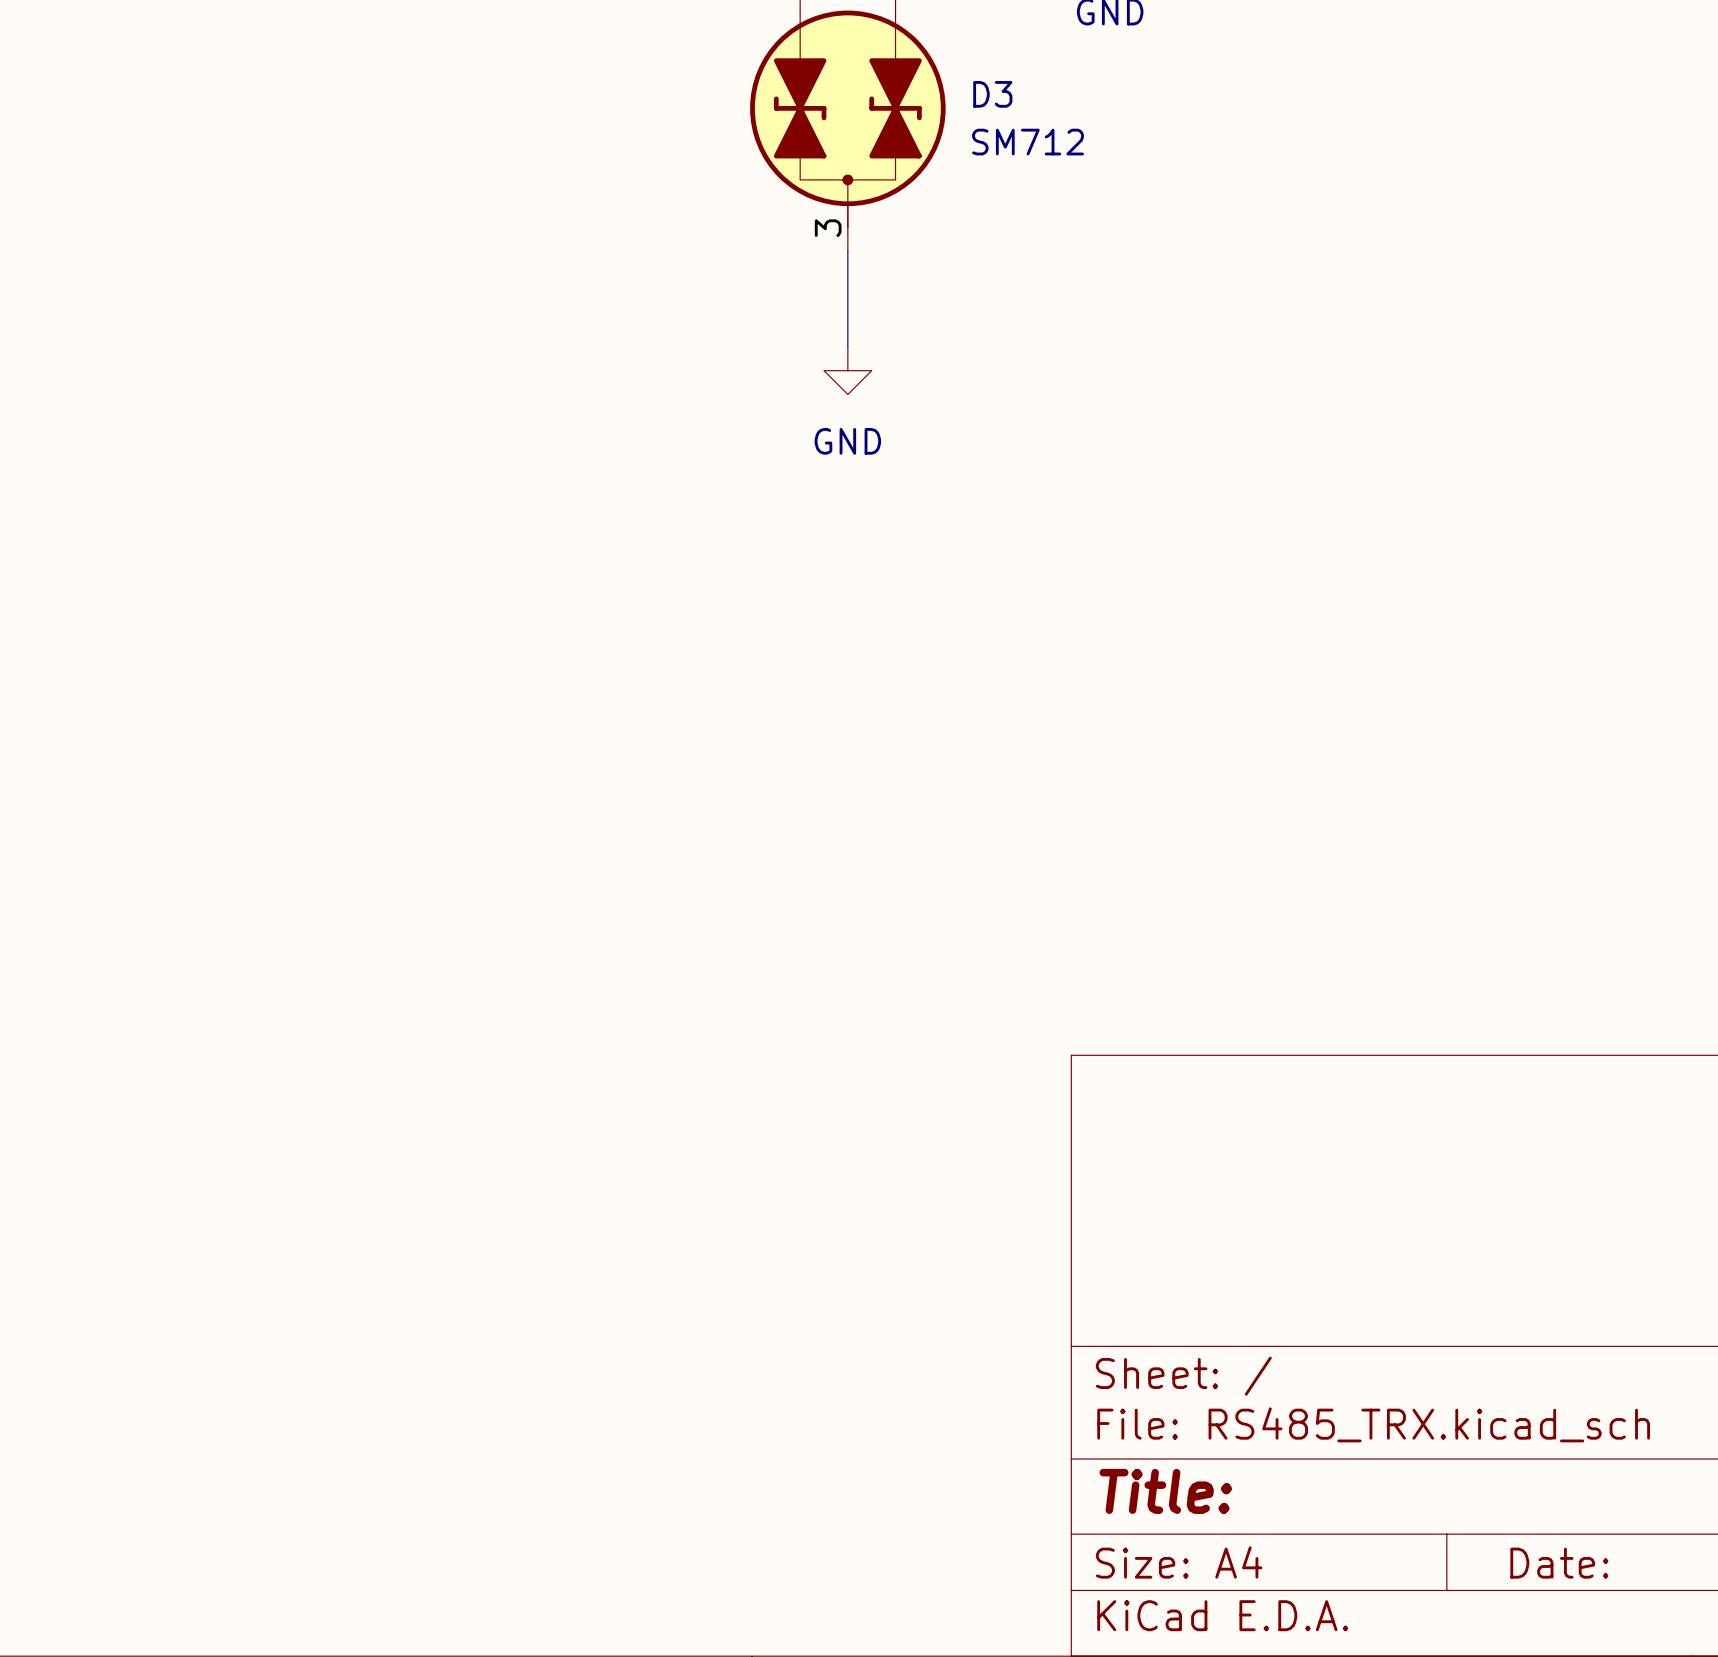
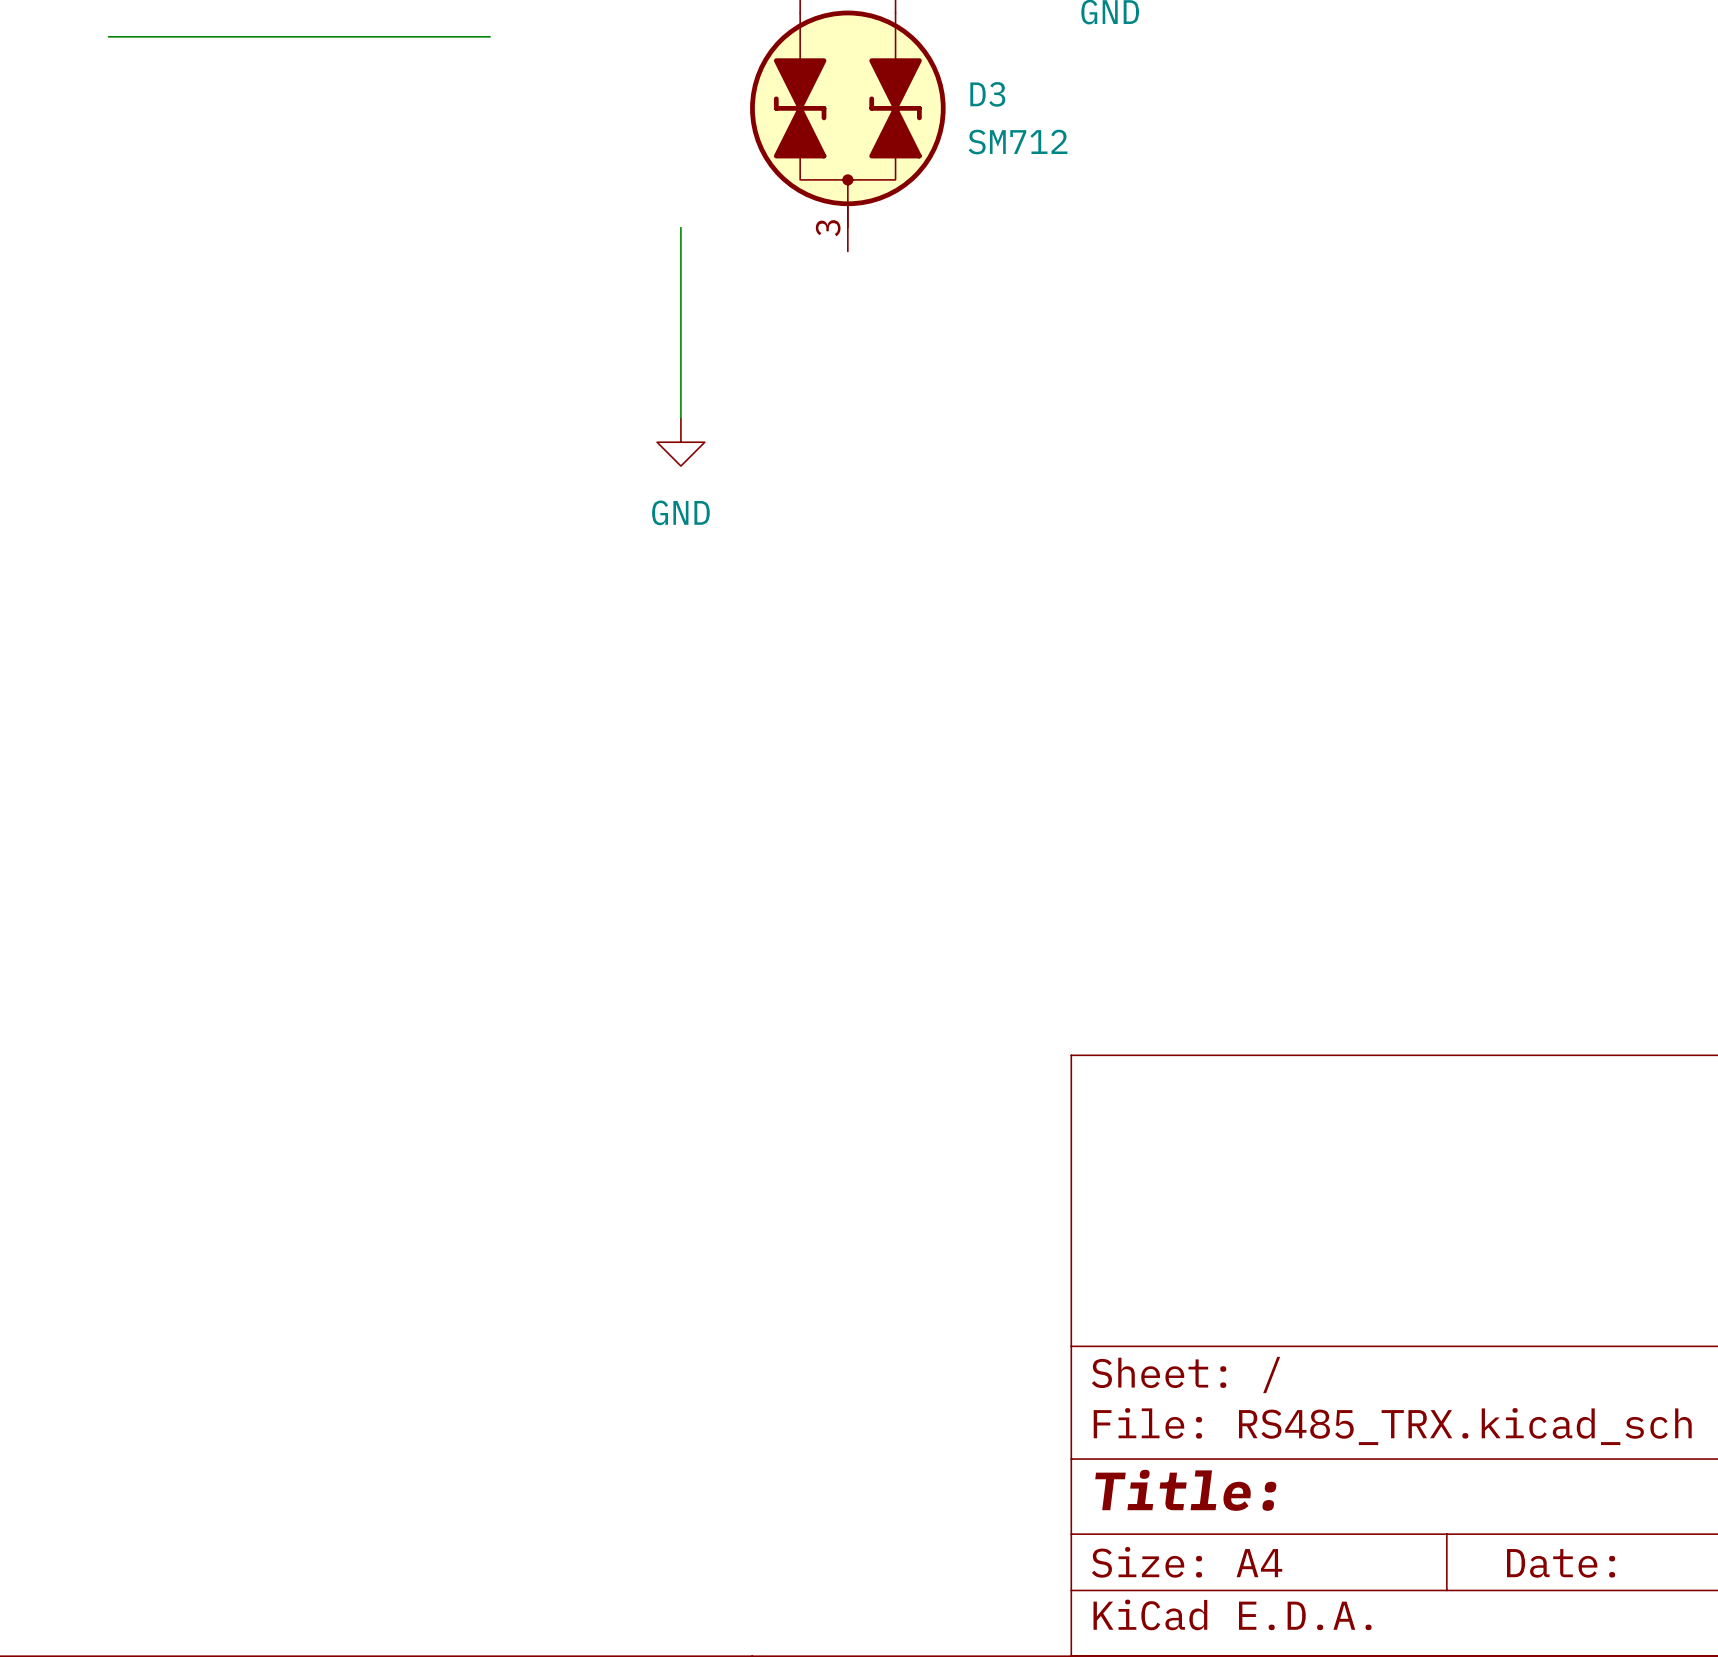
wire: none -> (108, 36) (490, 36)
wire: none -> (680, 227) (680, 418)
wire: (847, 251) (847, 346) -> none
power symbol position: GND (847, 370) -> GND (680, 442)

